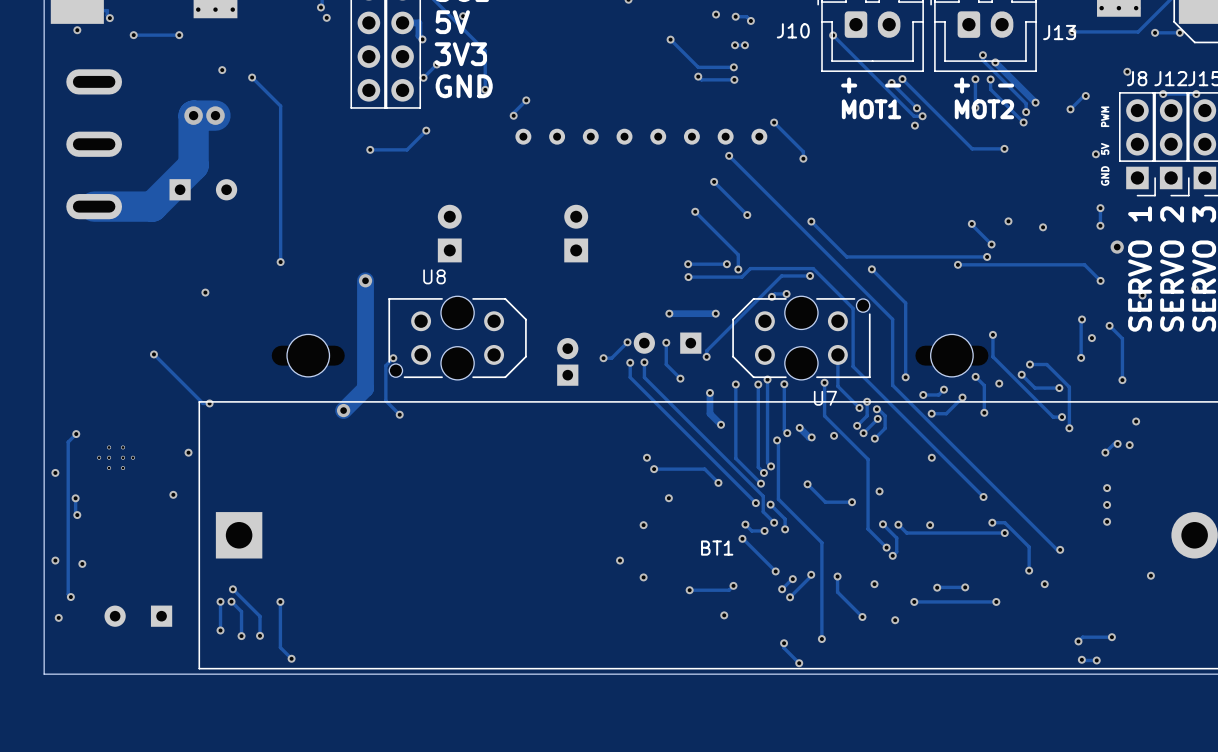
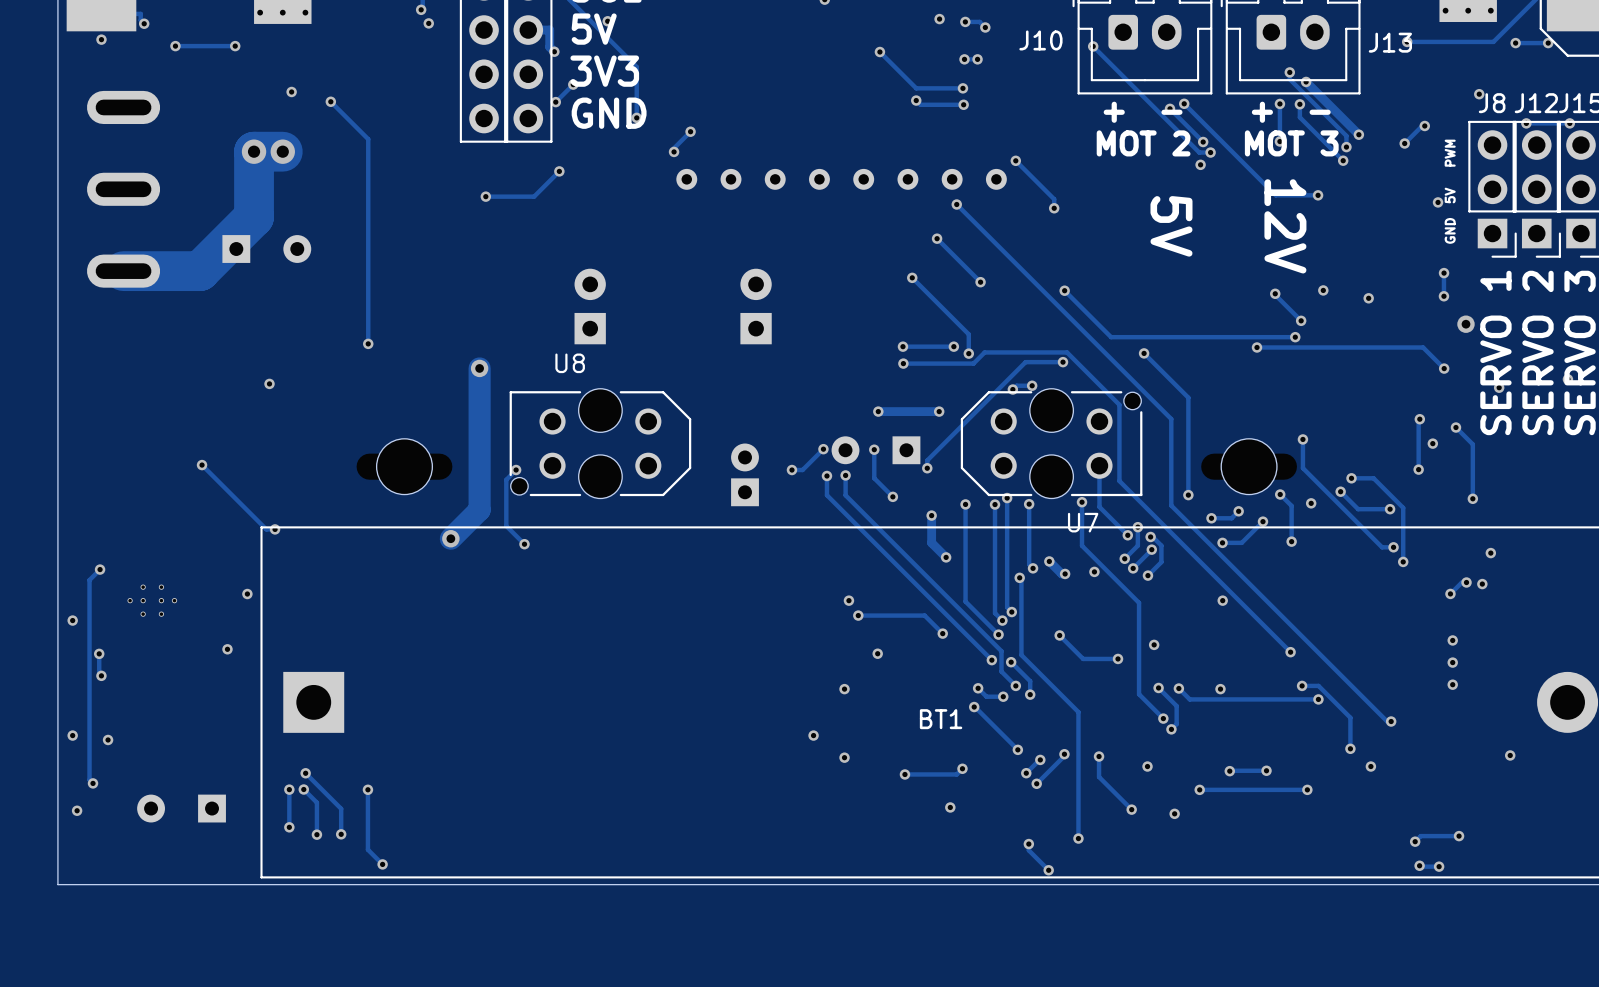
text: MOT1 (871, 109) -> MOT 2 (1143, 143)
text: MOT2 (984, 109) -> MOT 3 (1291, 143)
text: none -> 5V (1171, 226)
text: none -> 12V (1285, 226)

